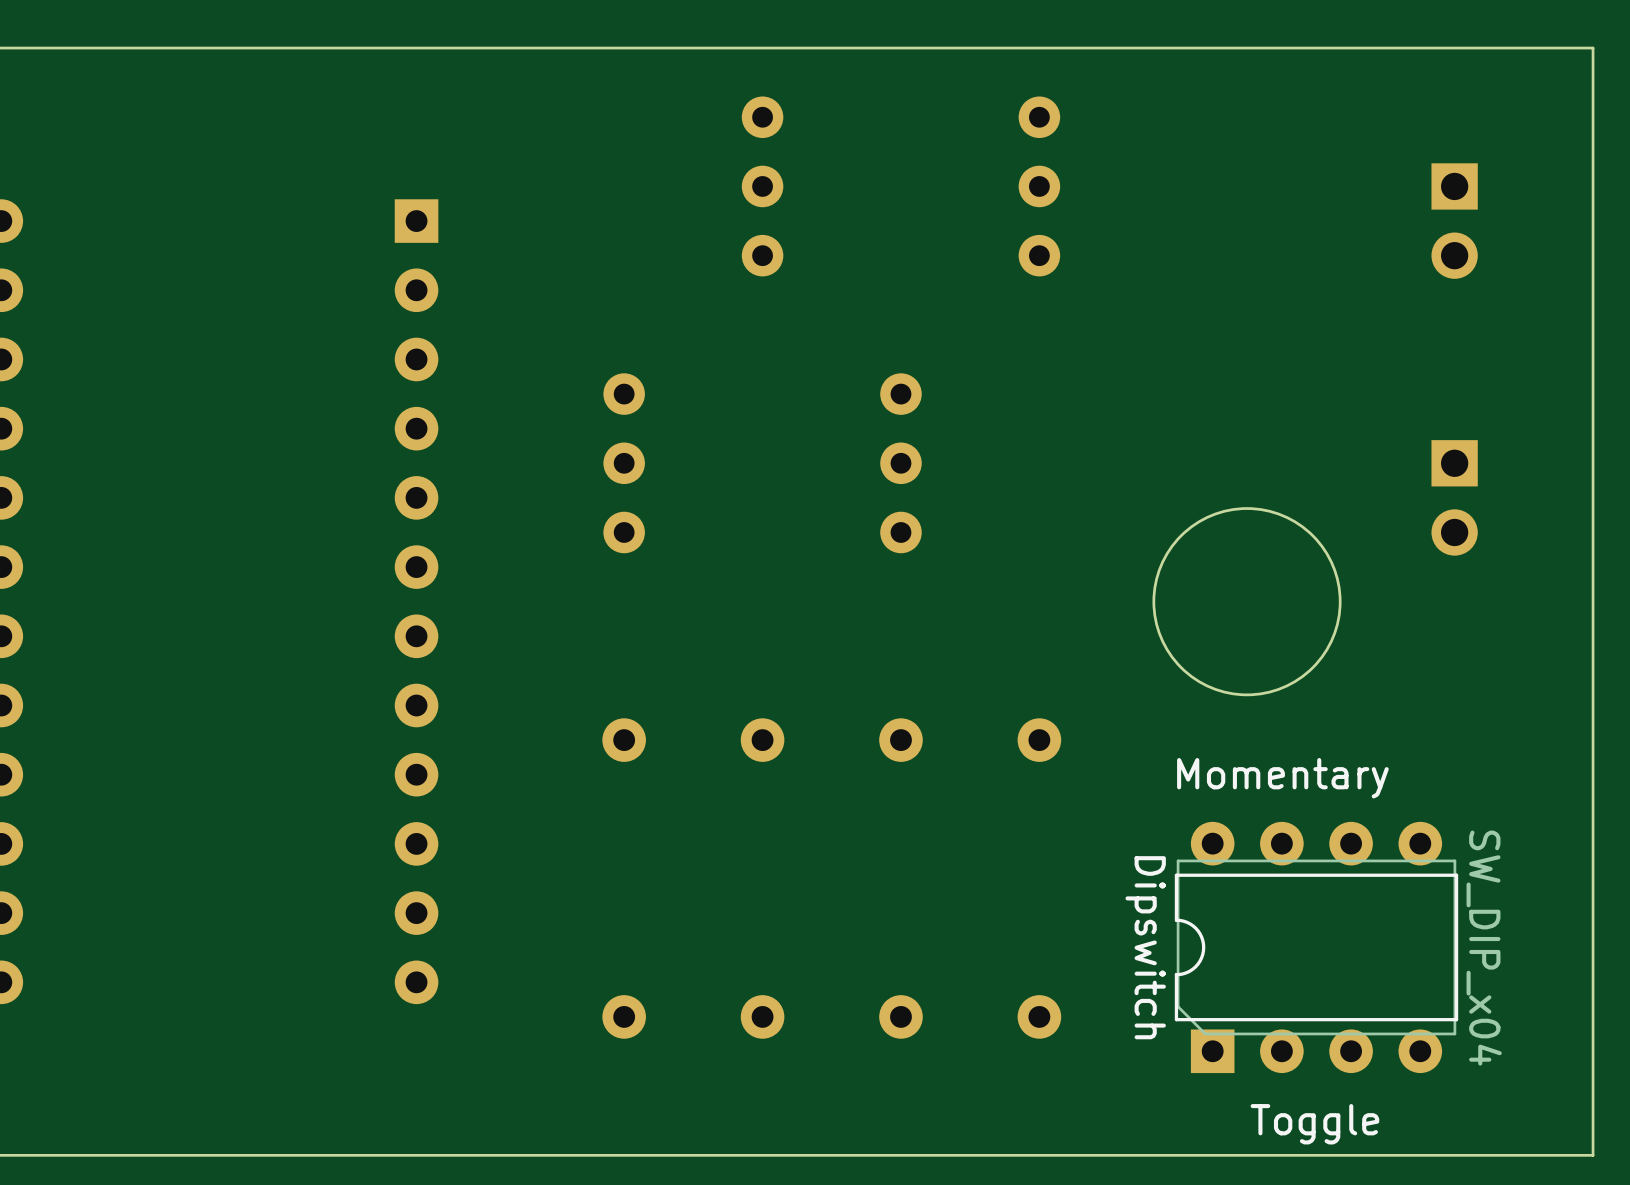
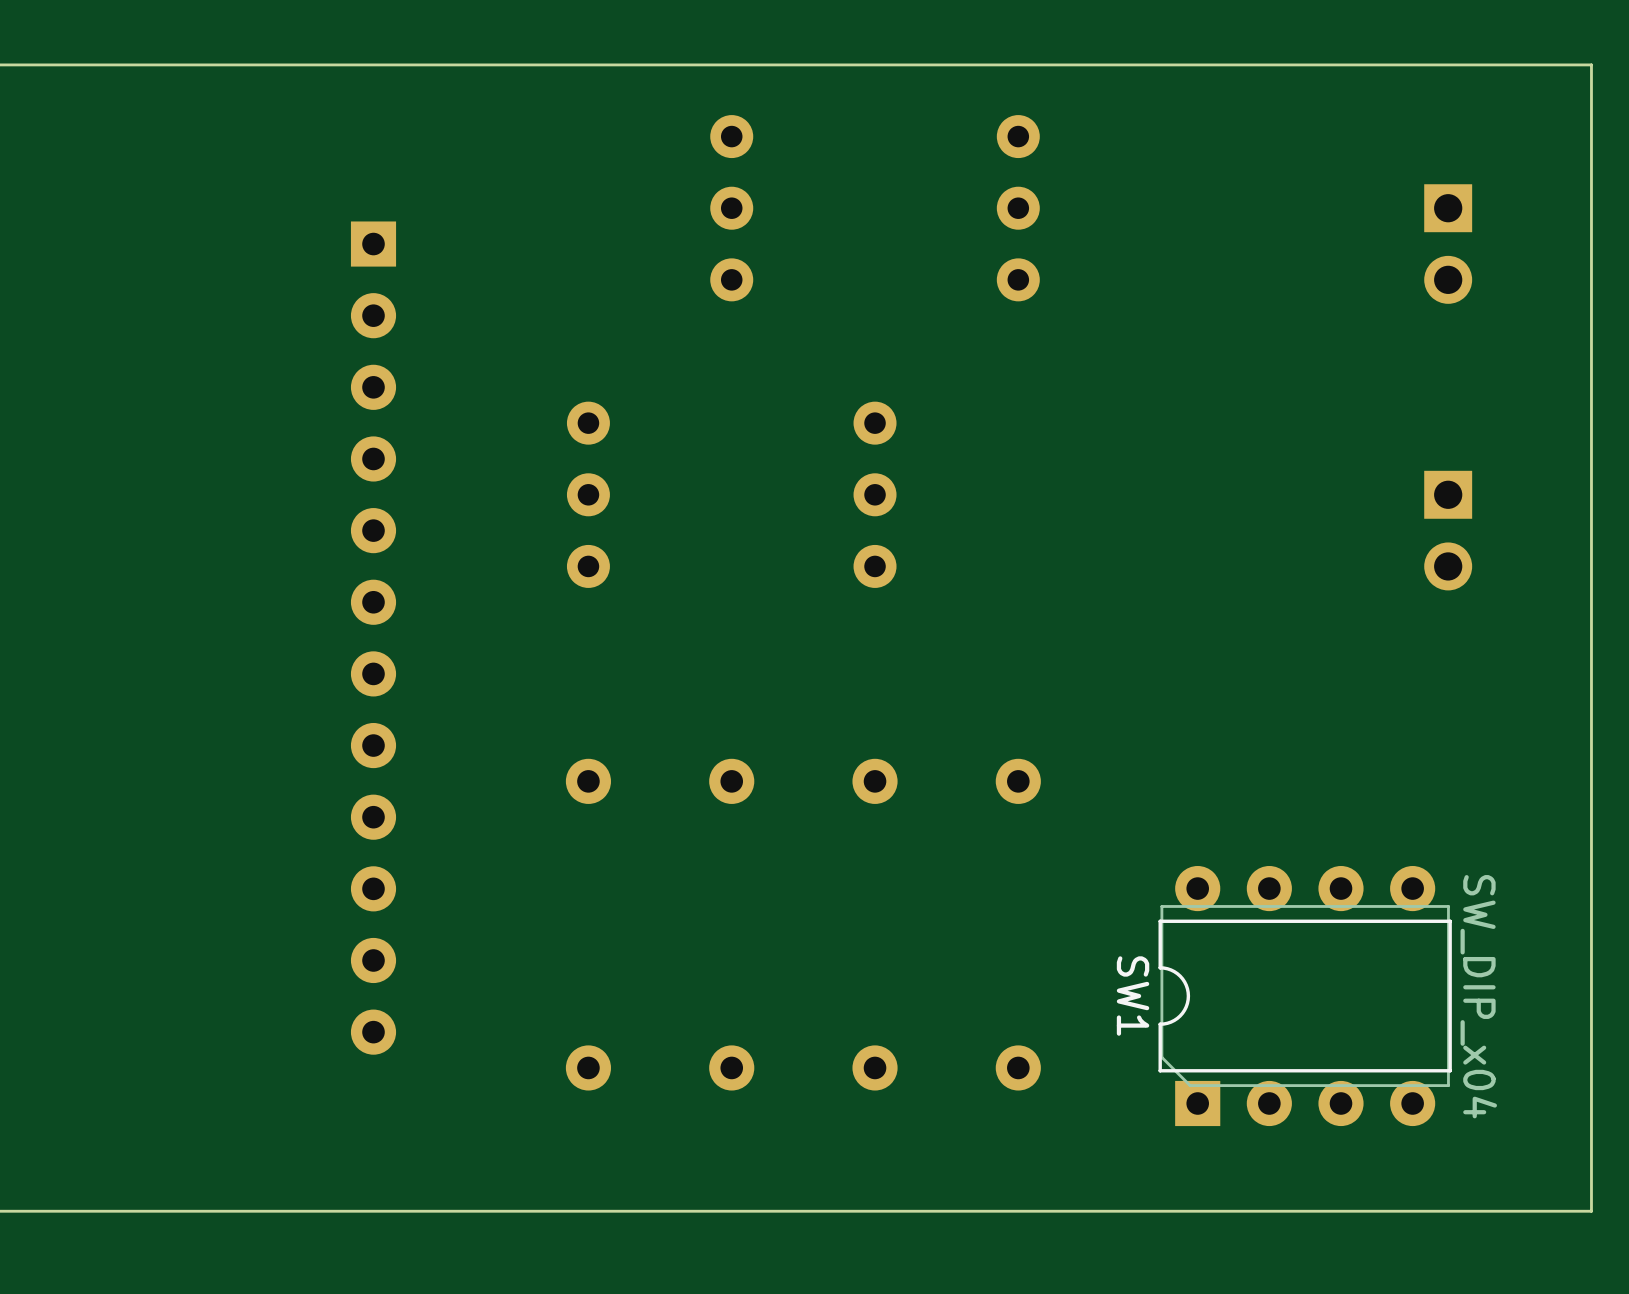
round board edge: [1152, 507, 1342, 697] -> none
text: Momentary (1282, 778) -> none
Dipswitch name: Dipswitch (1145, 947) -> SW1 (1133, 996)
text: Toggle (1314, 1124) -> none

